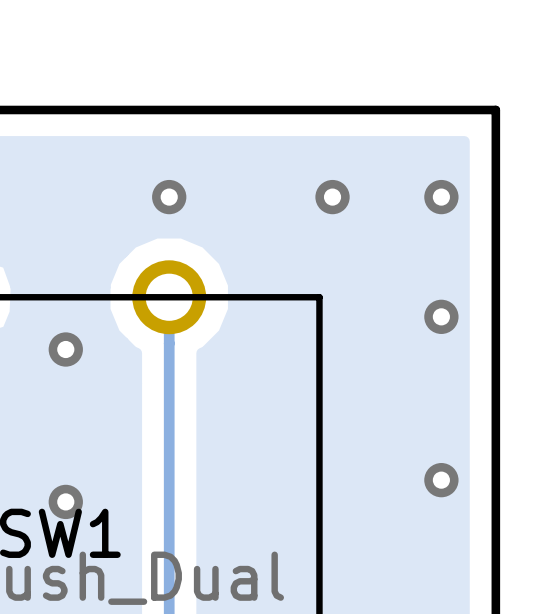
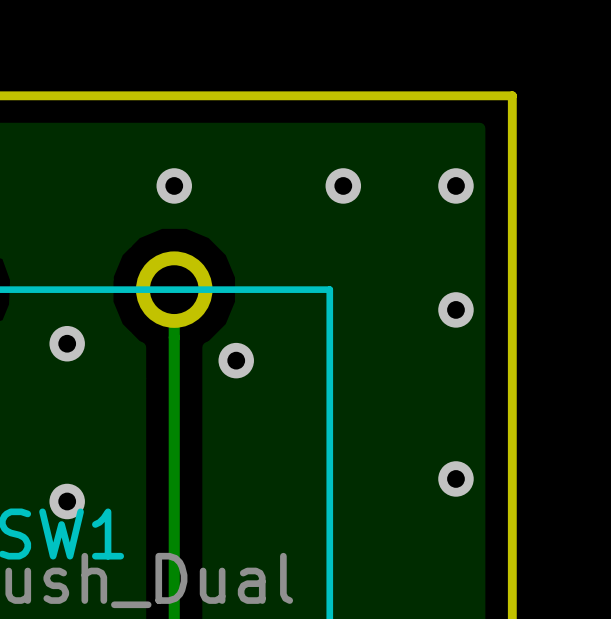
via: none -> (236, 360)

